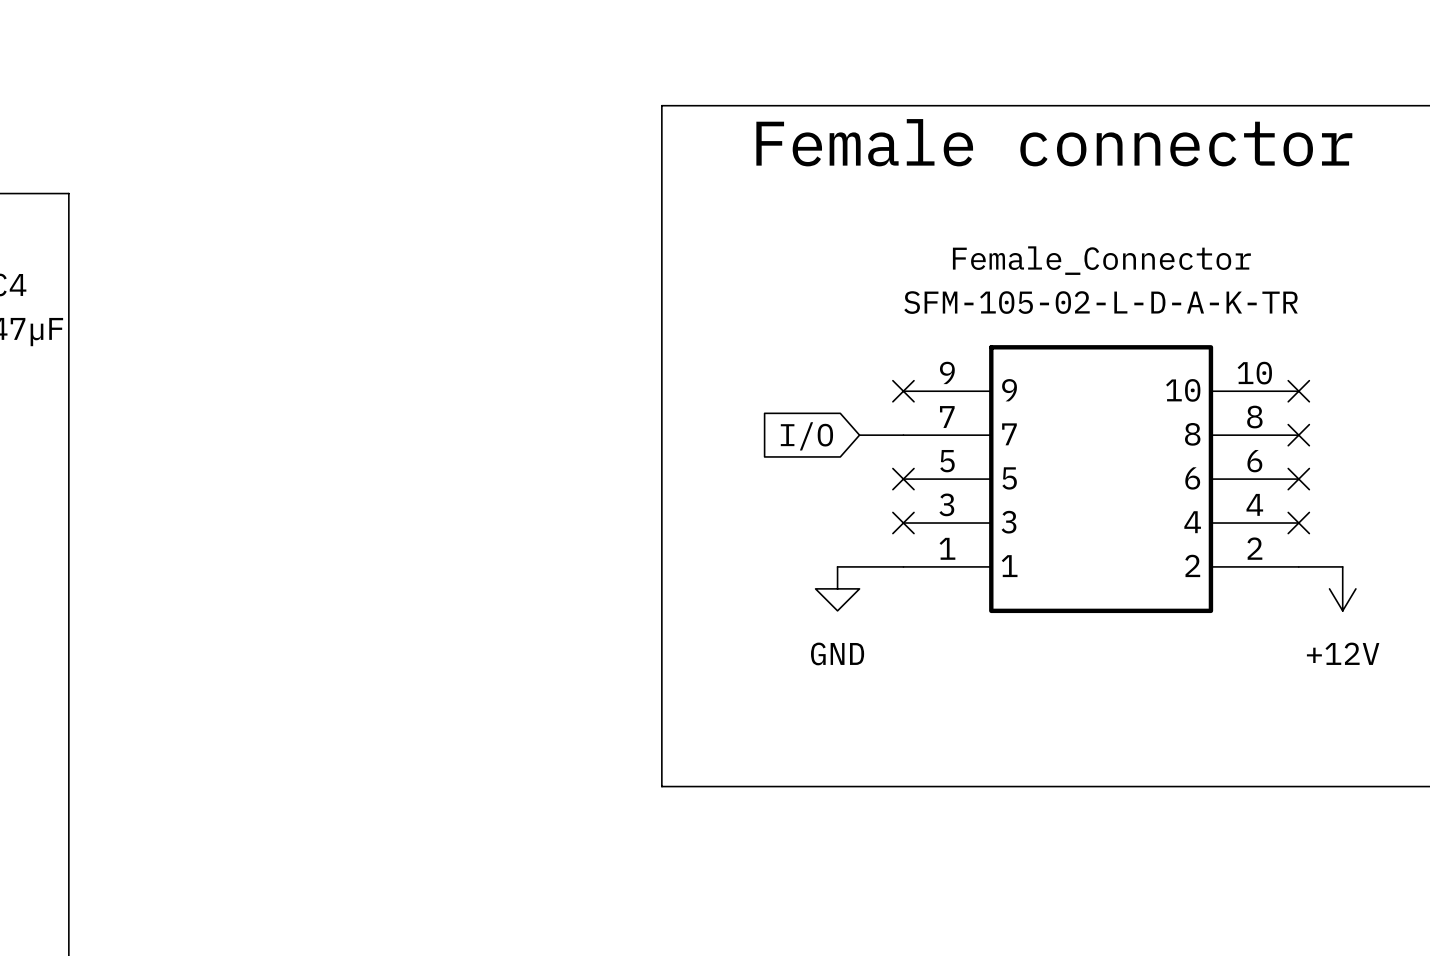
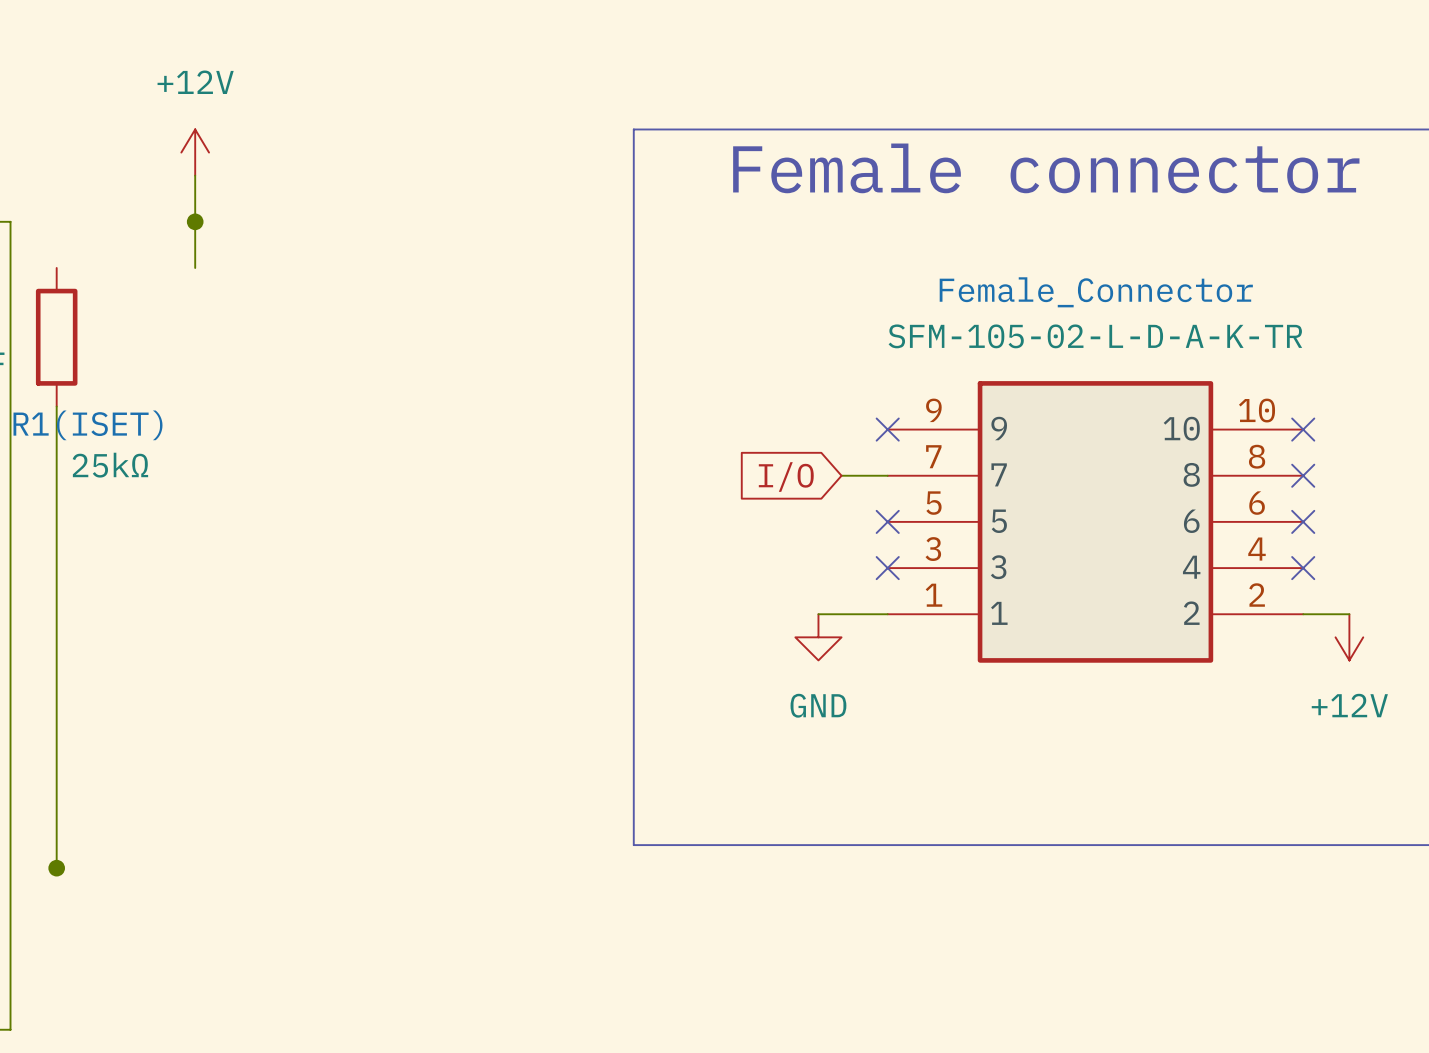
power symbol: none -> +12V (195, 152)
wire: none -> (195, 175) (195, 267)
junction: none -> (195, 221)
R1(ISET): none -> 25kΩ (56, 337)
wire: none -> (56, 406) (56, 868)
junction: none -> (56, 868)

